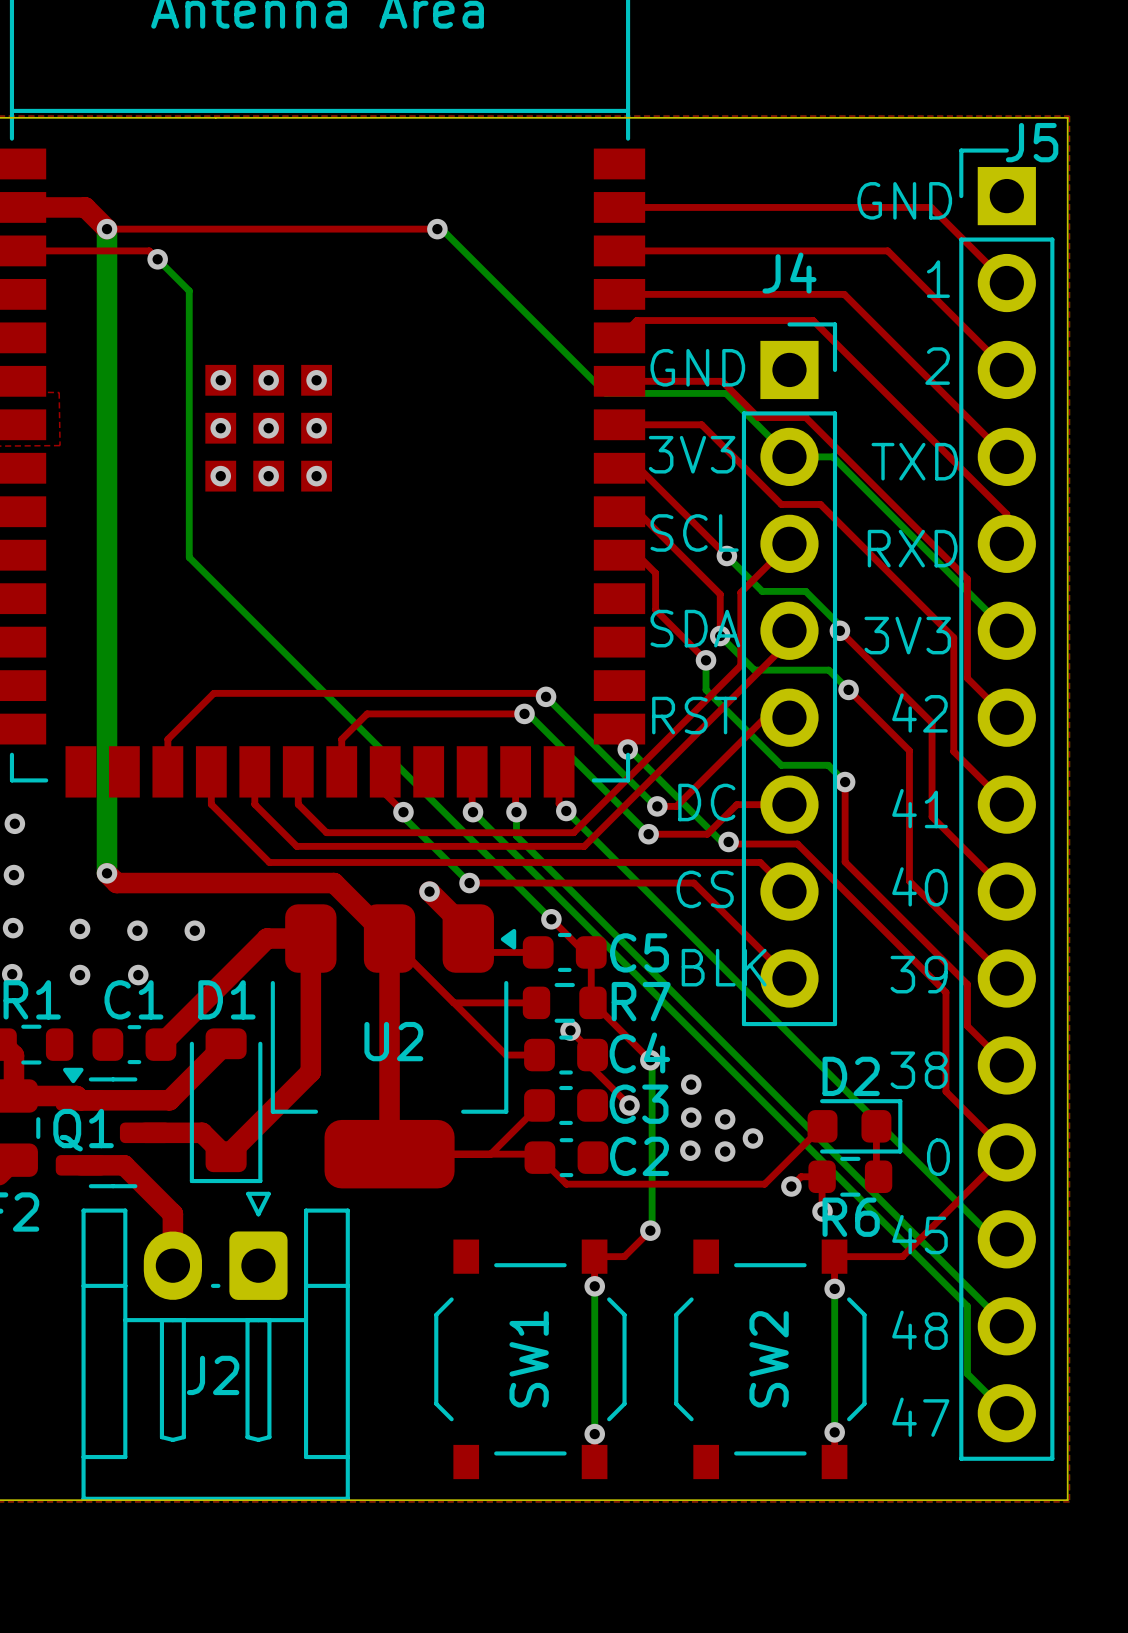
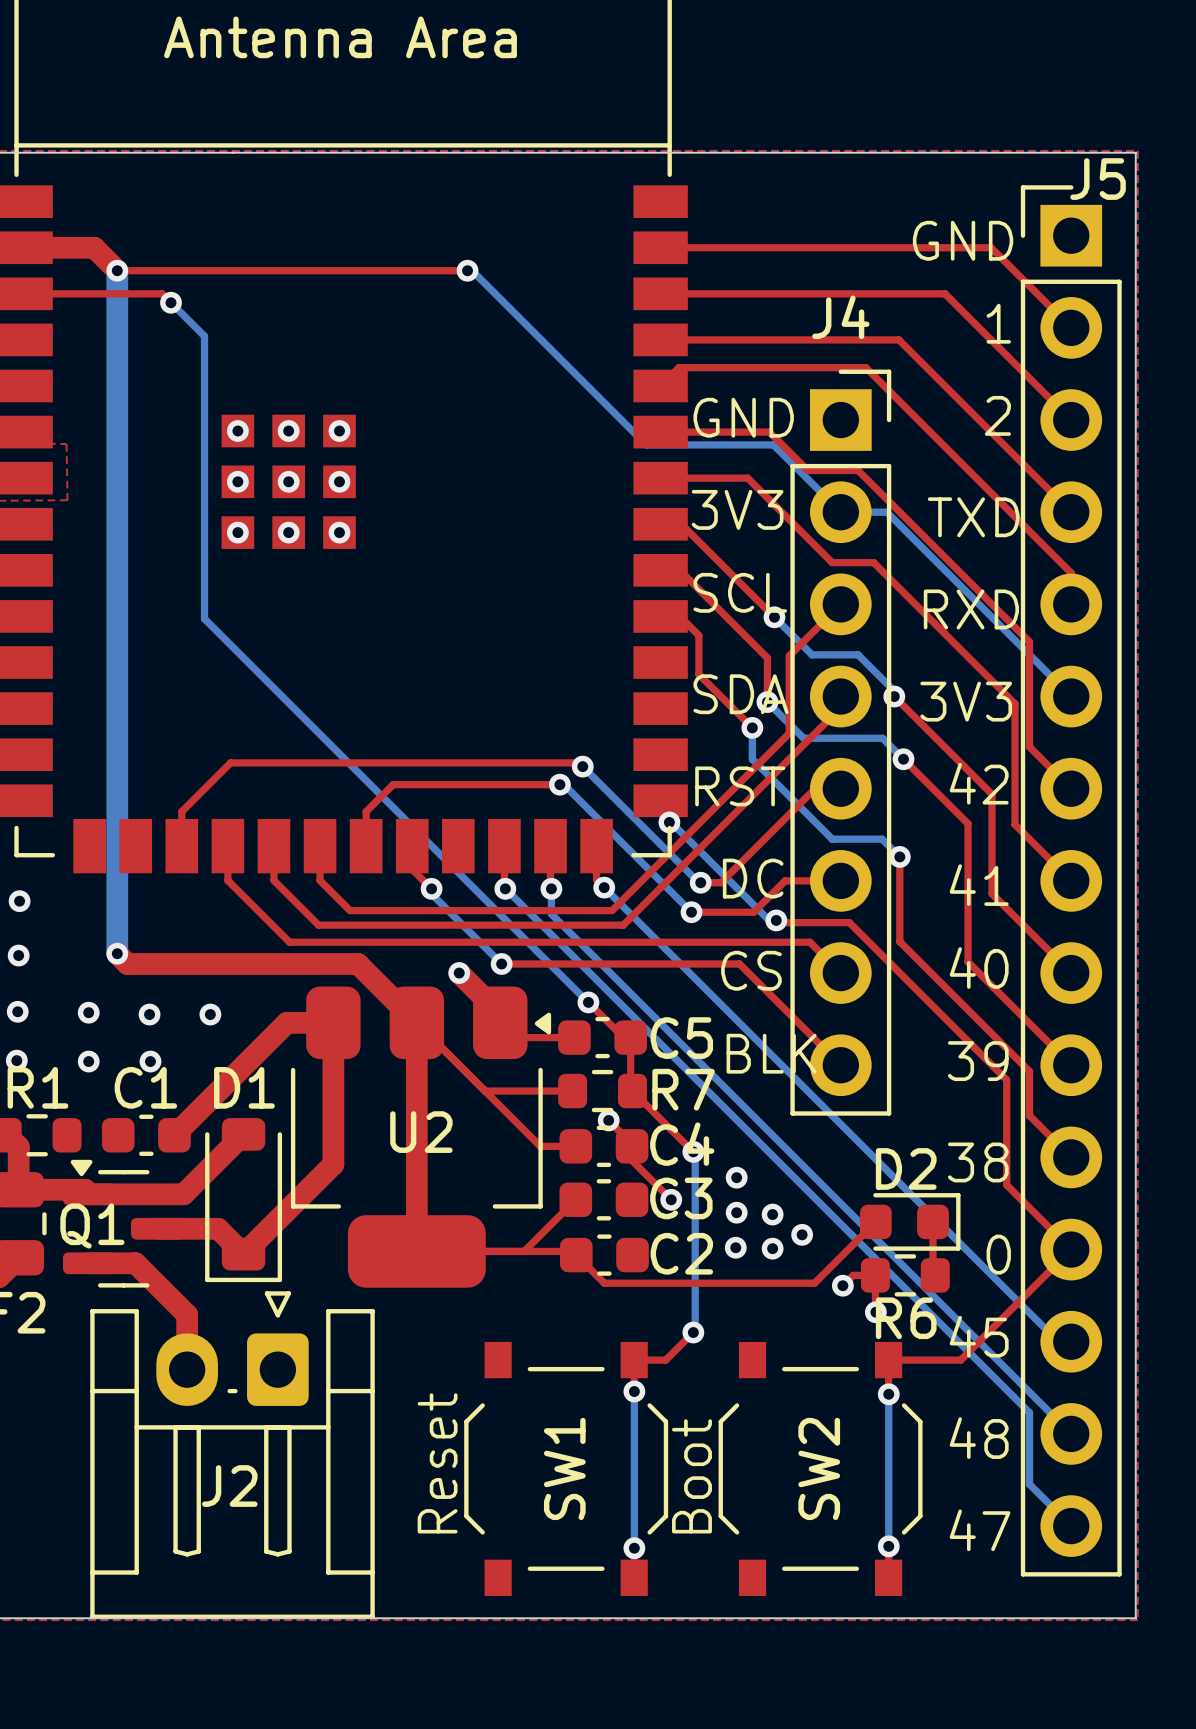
text: none -> Reset (437, 1463)
text: none -> Boot (691, 1476)

